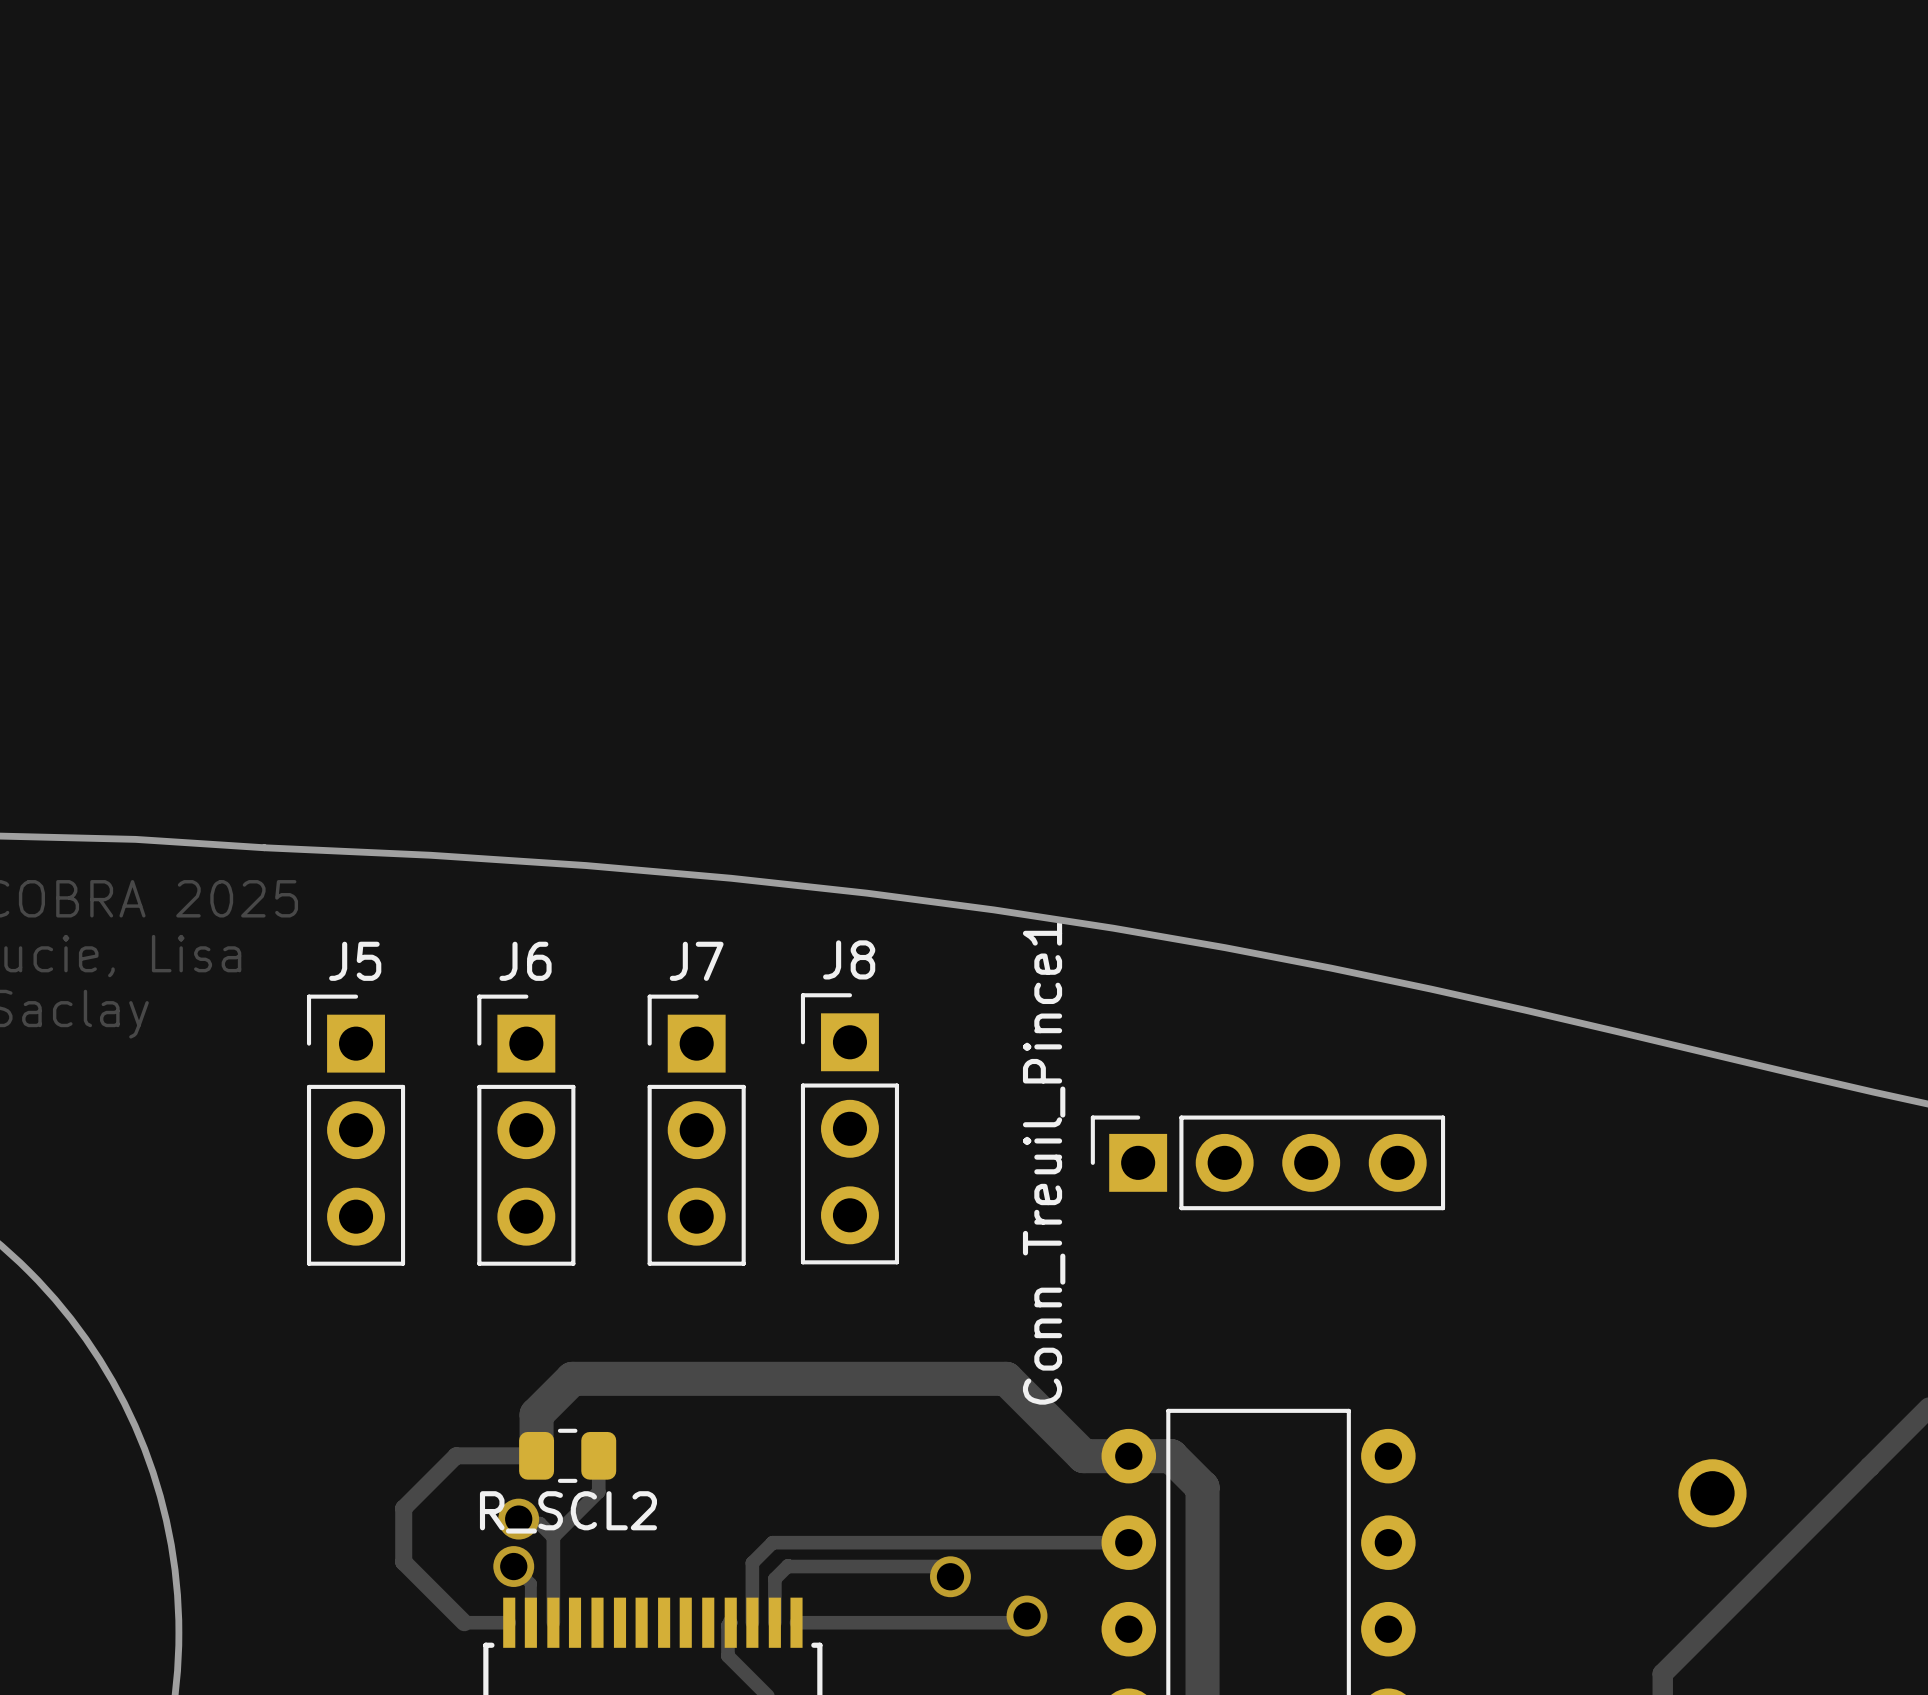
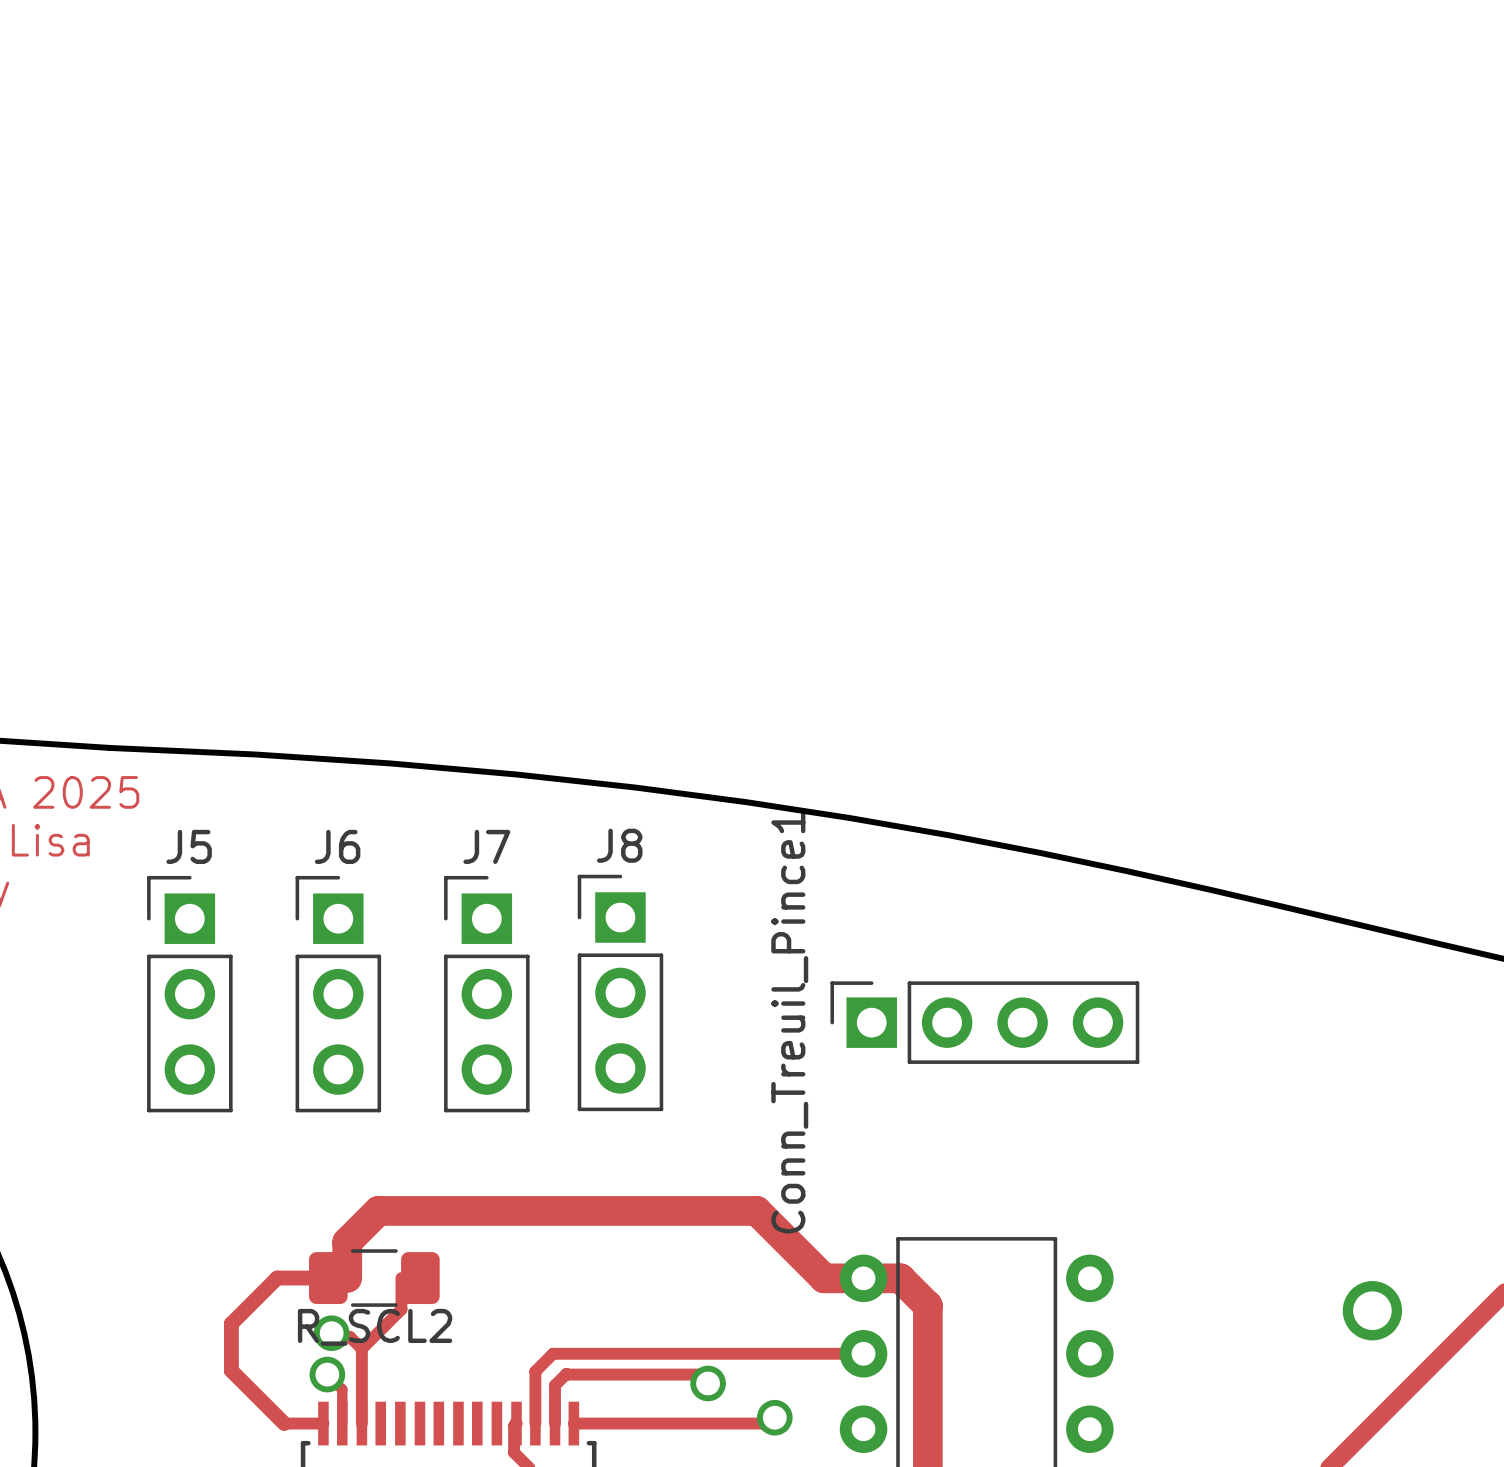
R_SCL2 footprint: [519, 1428, 617, 1483] -> [309, 1249, 440, 1307]

